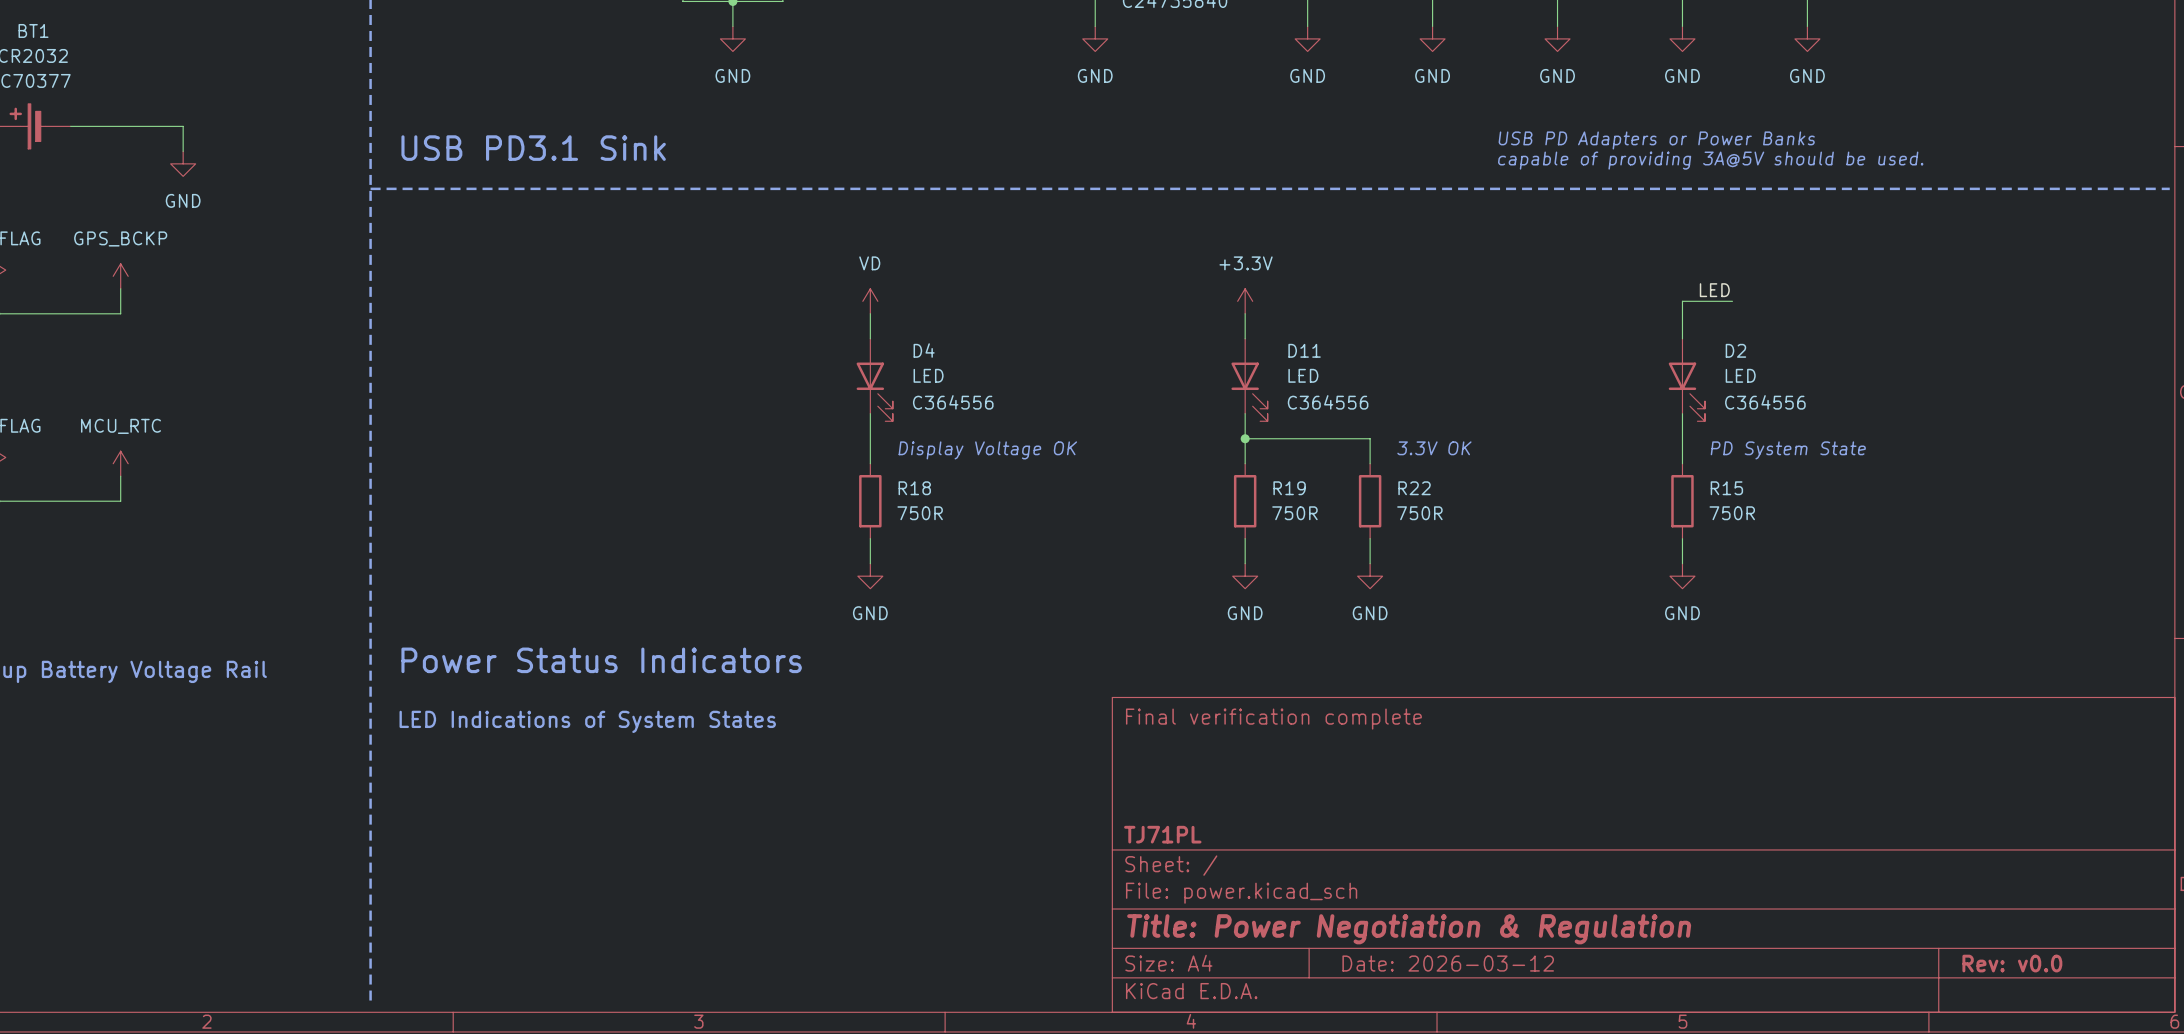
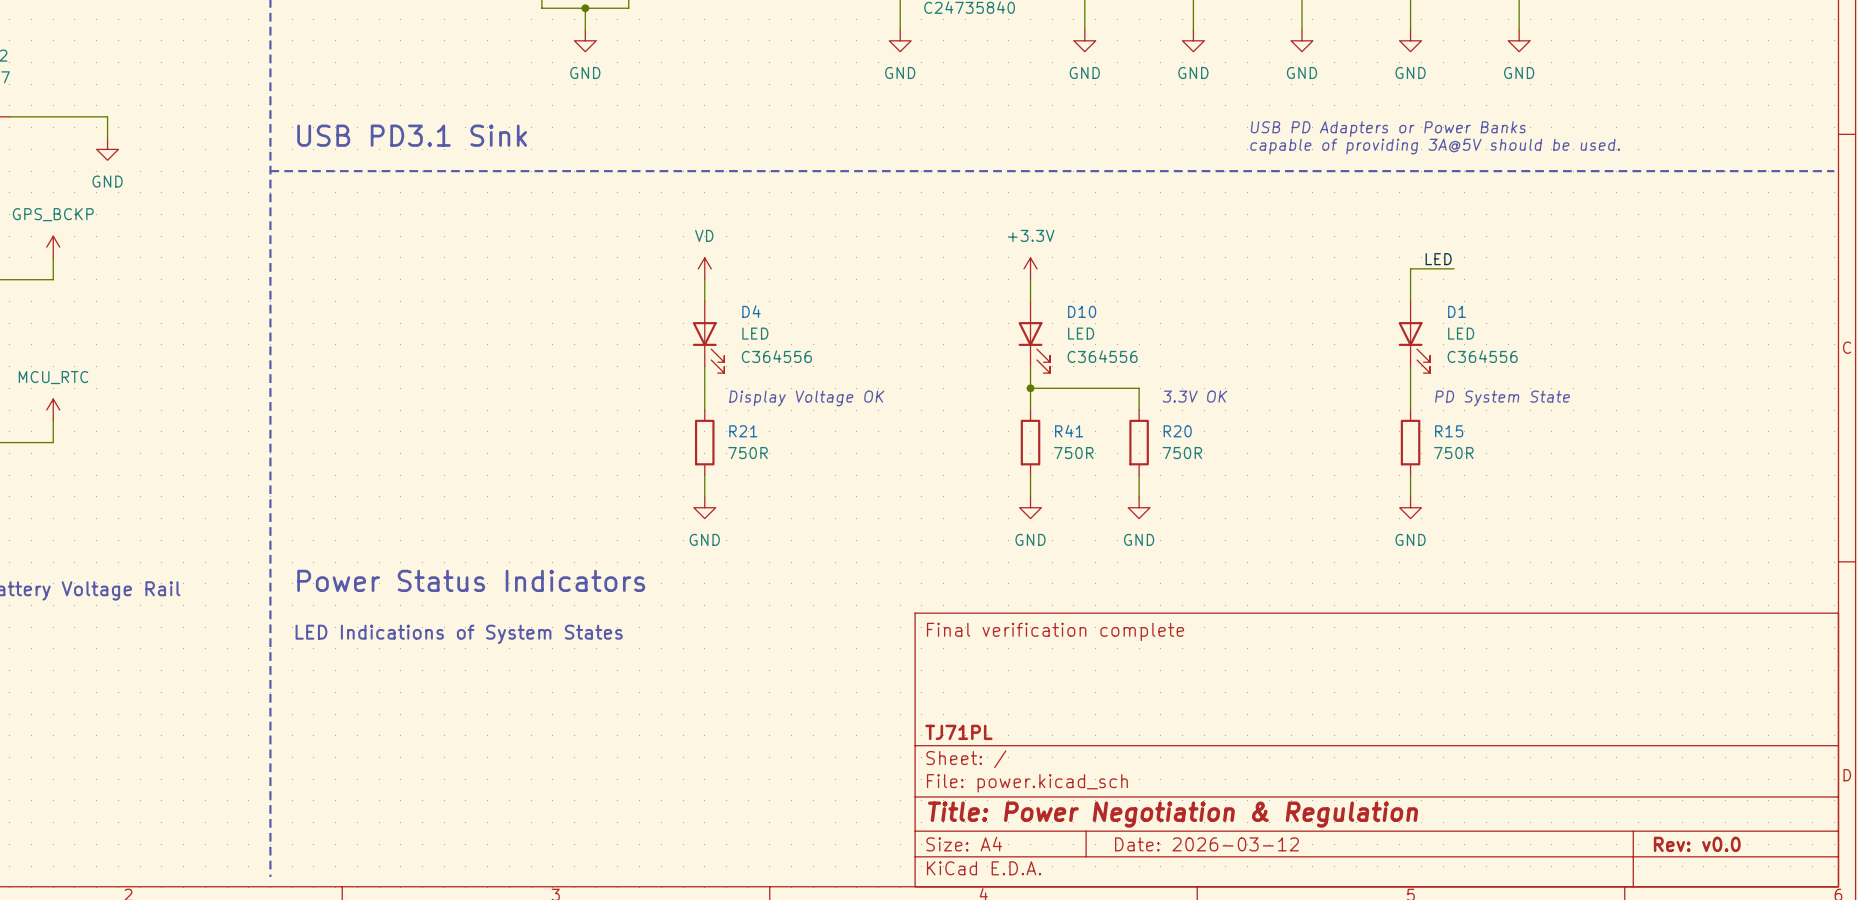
D11 name: D11 (1304, 350) -> D10 (1082, 311)
D2 name: D2 (1735, 350) -> D1 (1457, 311)
R18 name: R18 (914, 488) -> R21 (743, 431)
R19 name: R19 (1289, 488) -> R41 (1069, 431)
R22 name: R22 (1414, 488) -> R20 (1177, 431)

